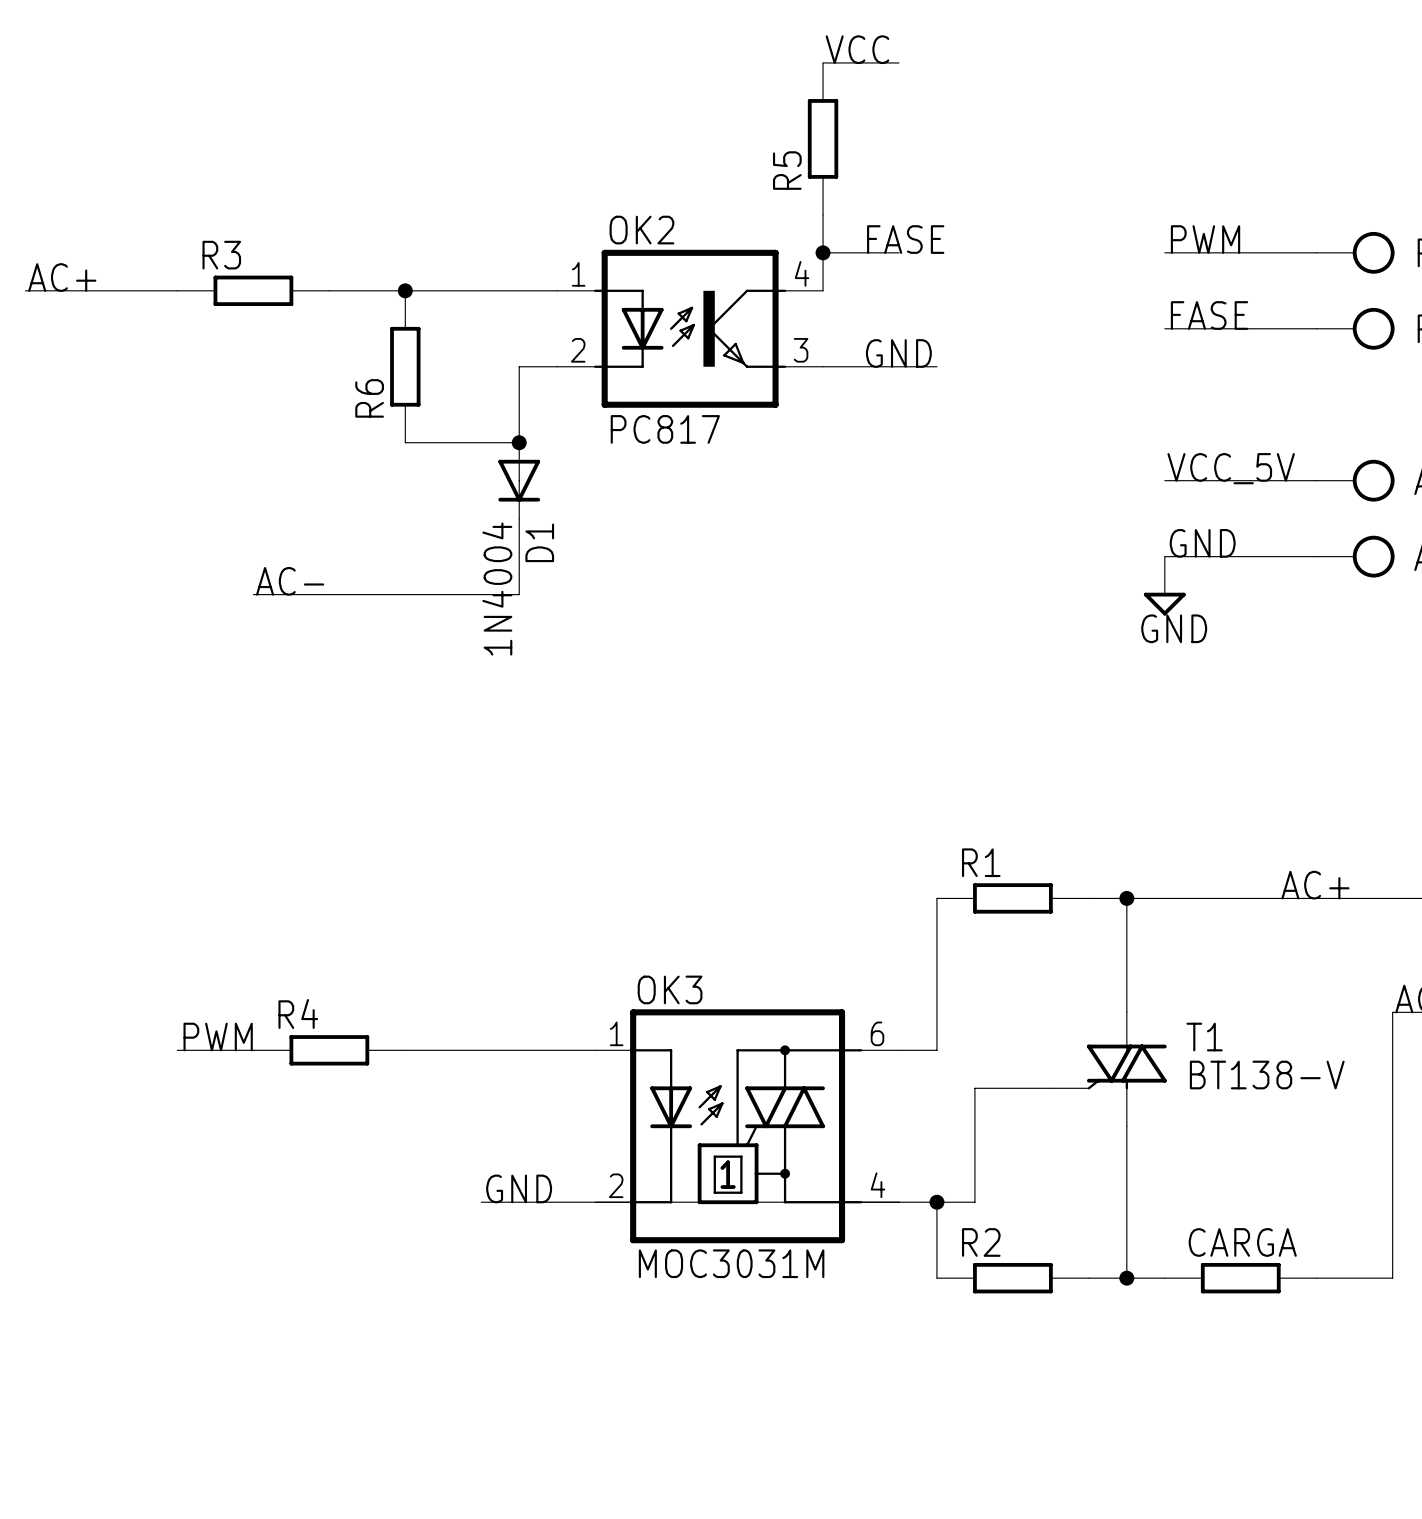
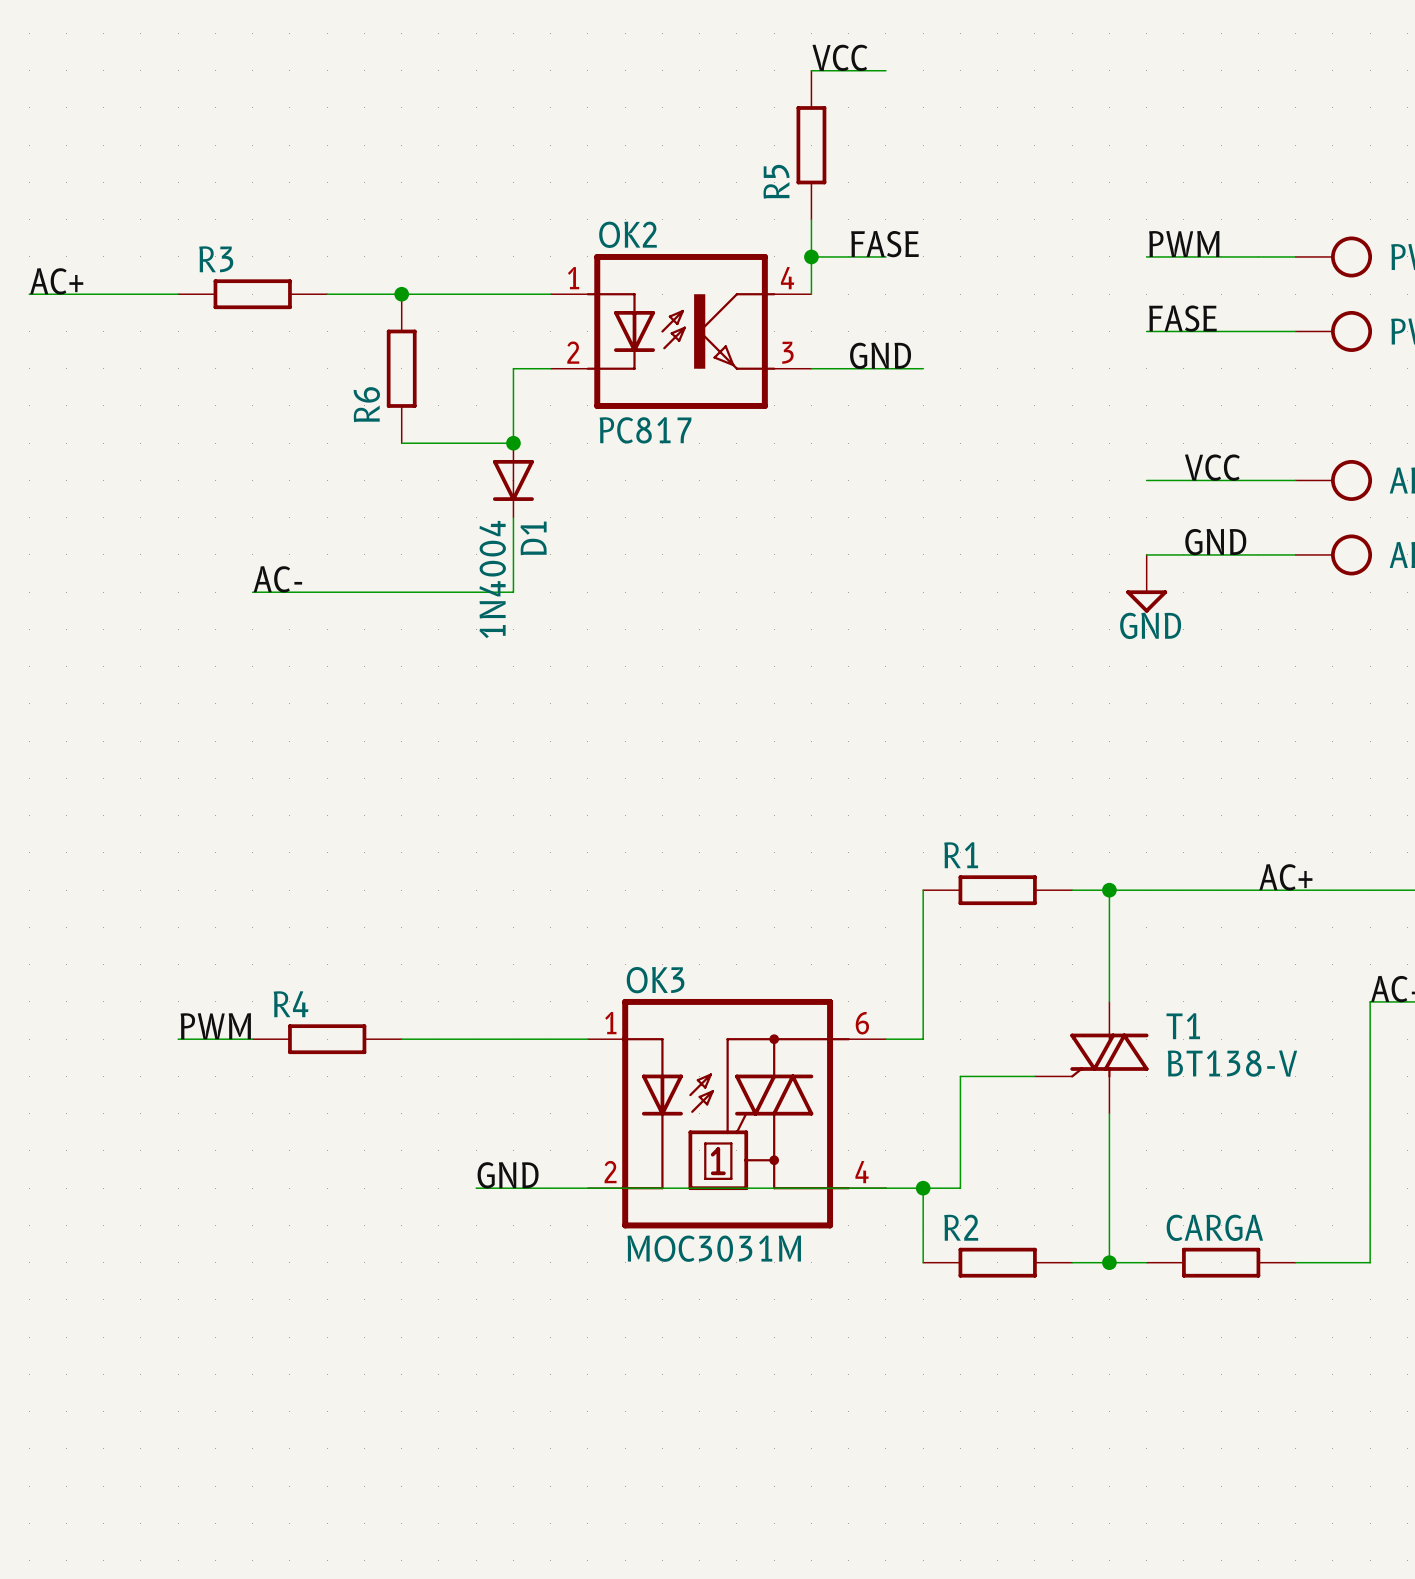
label: VCC_5V (1231, 468) -> VCC (1212, 467)
label position: GND (1202, 543) -> GND (1215, 542)

